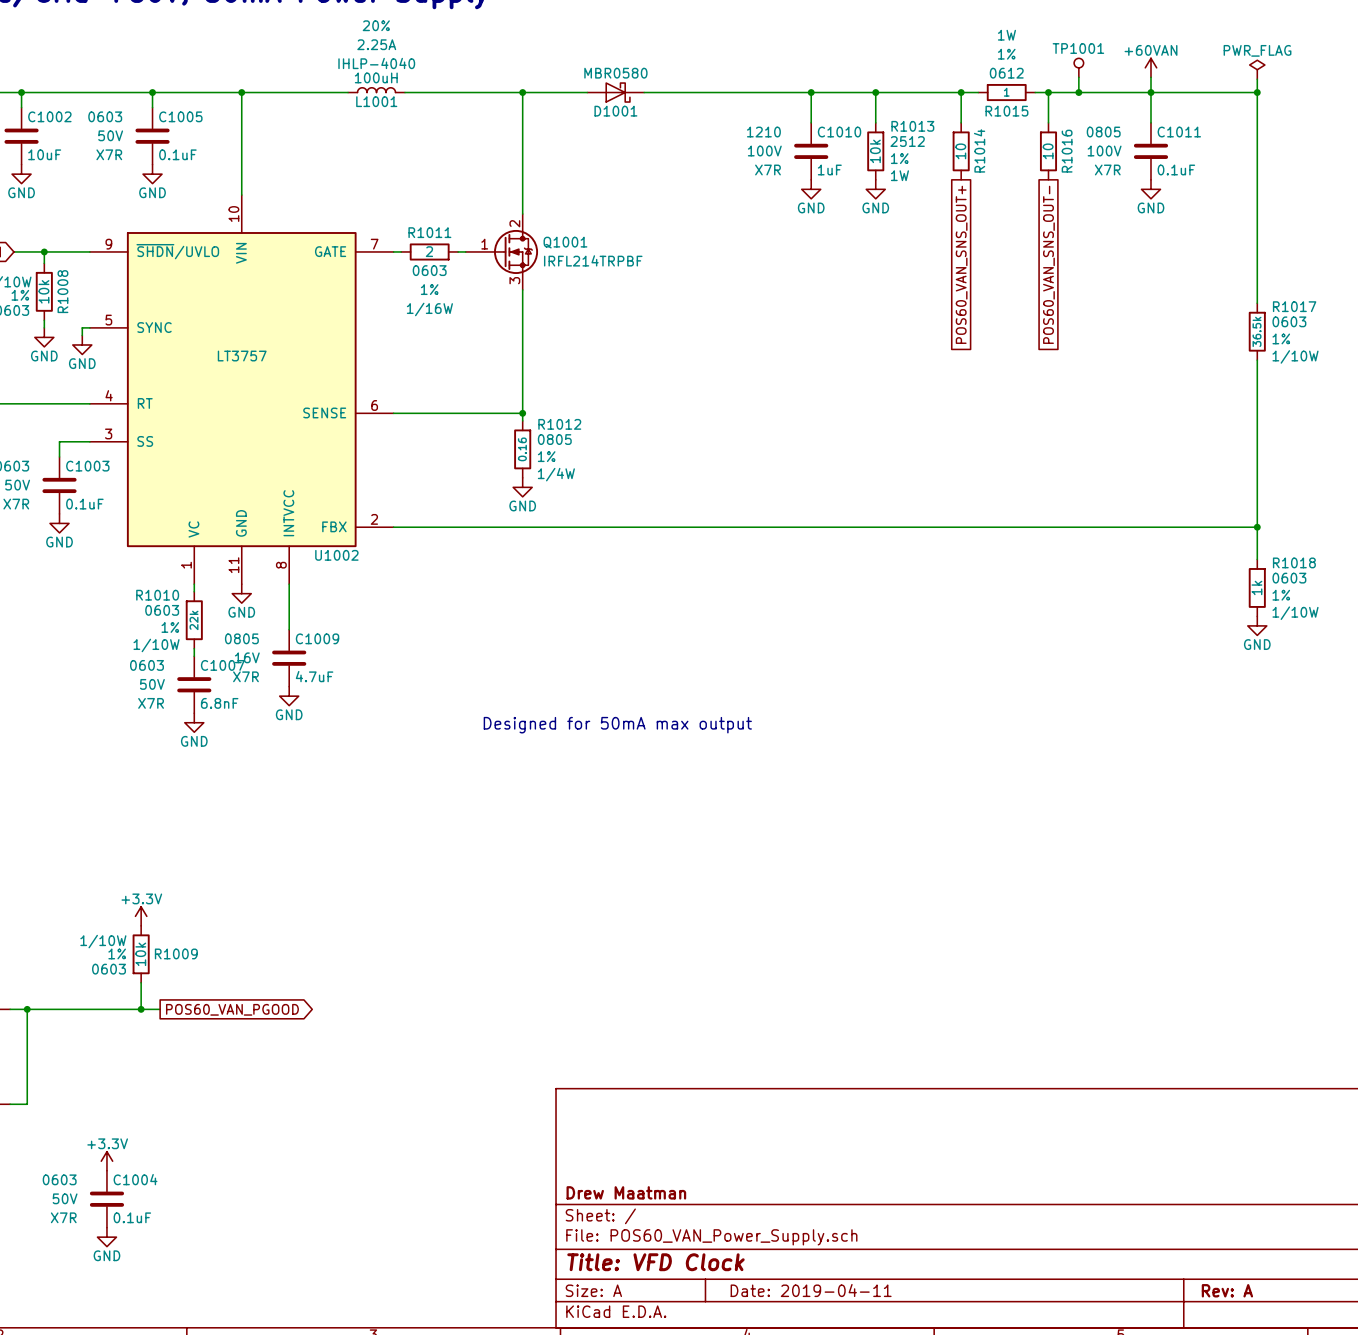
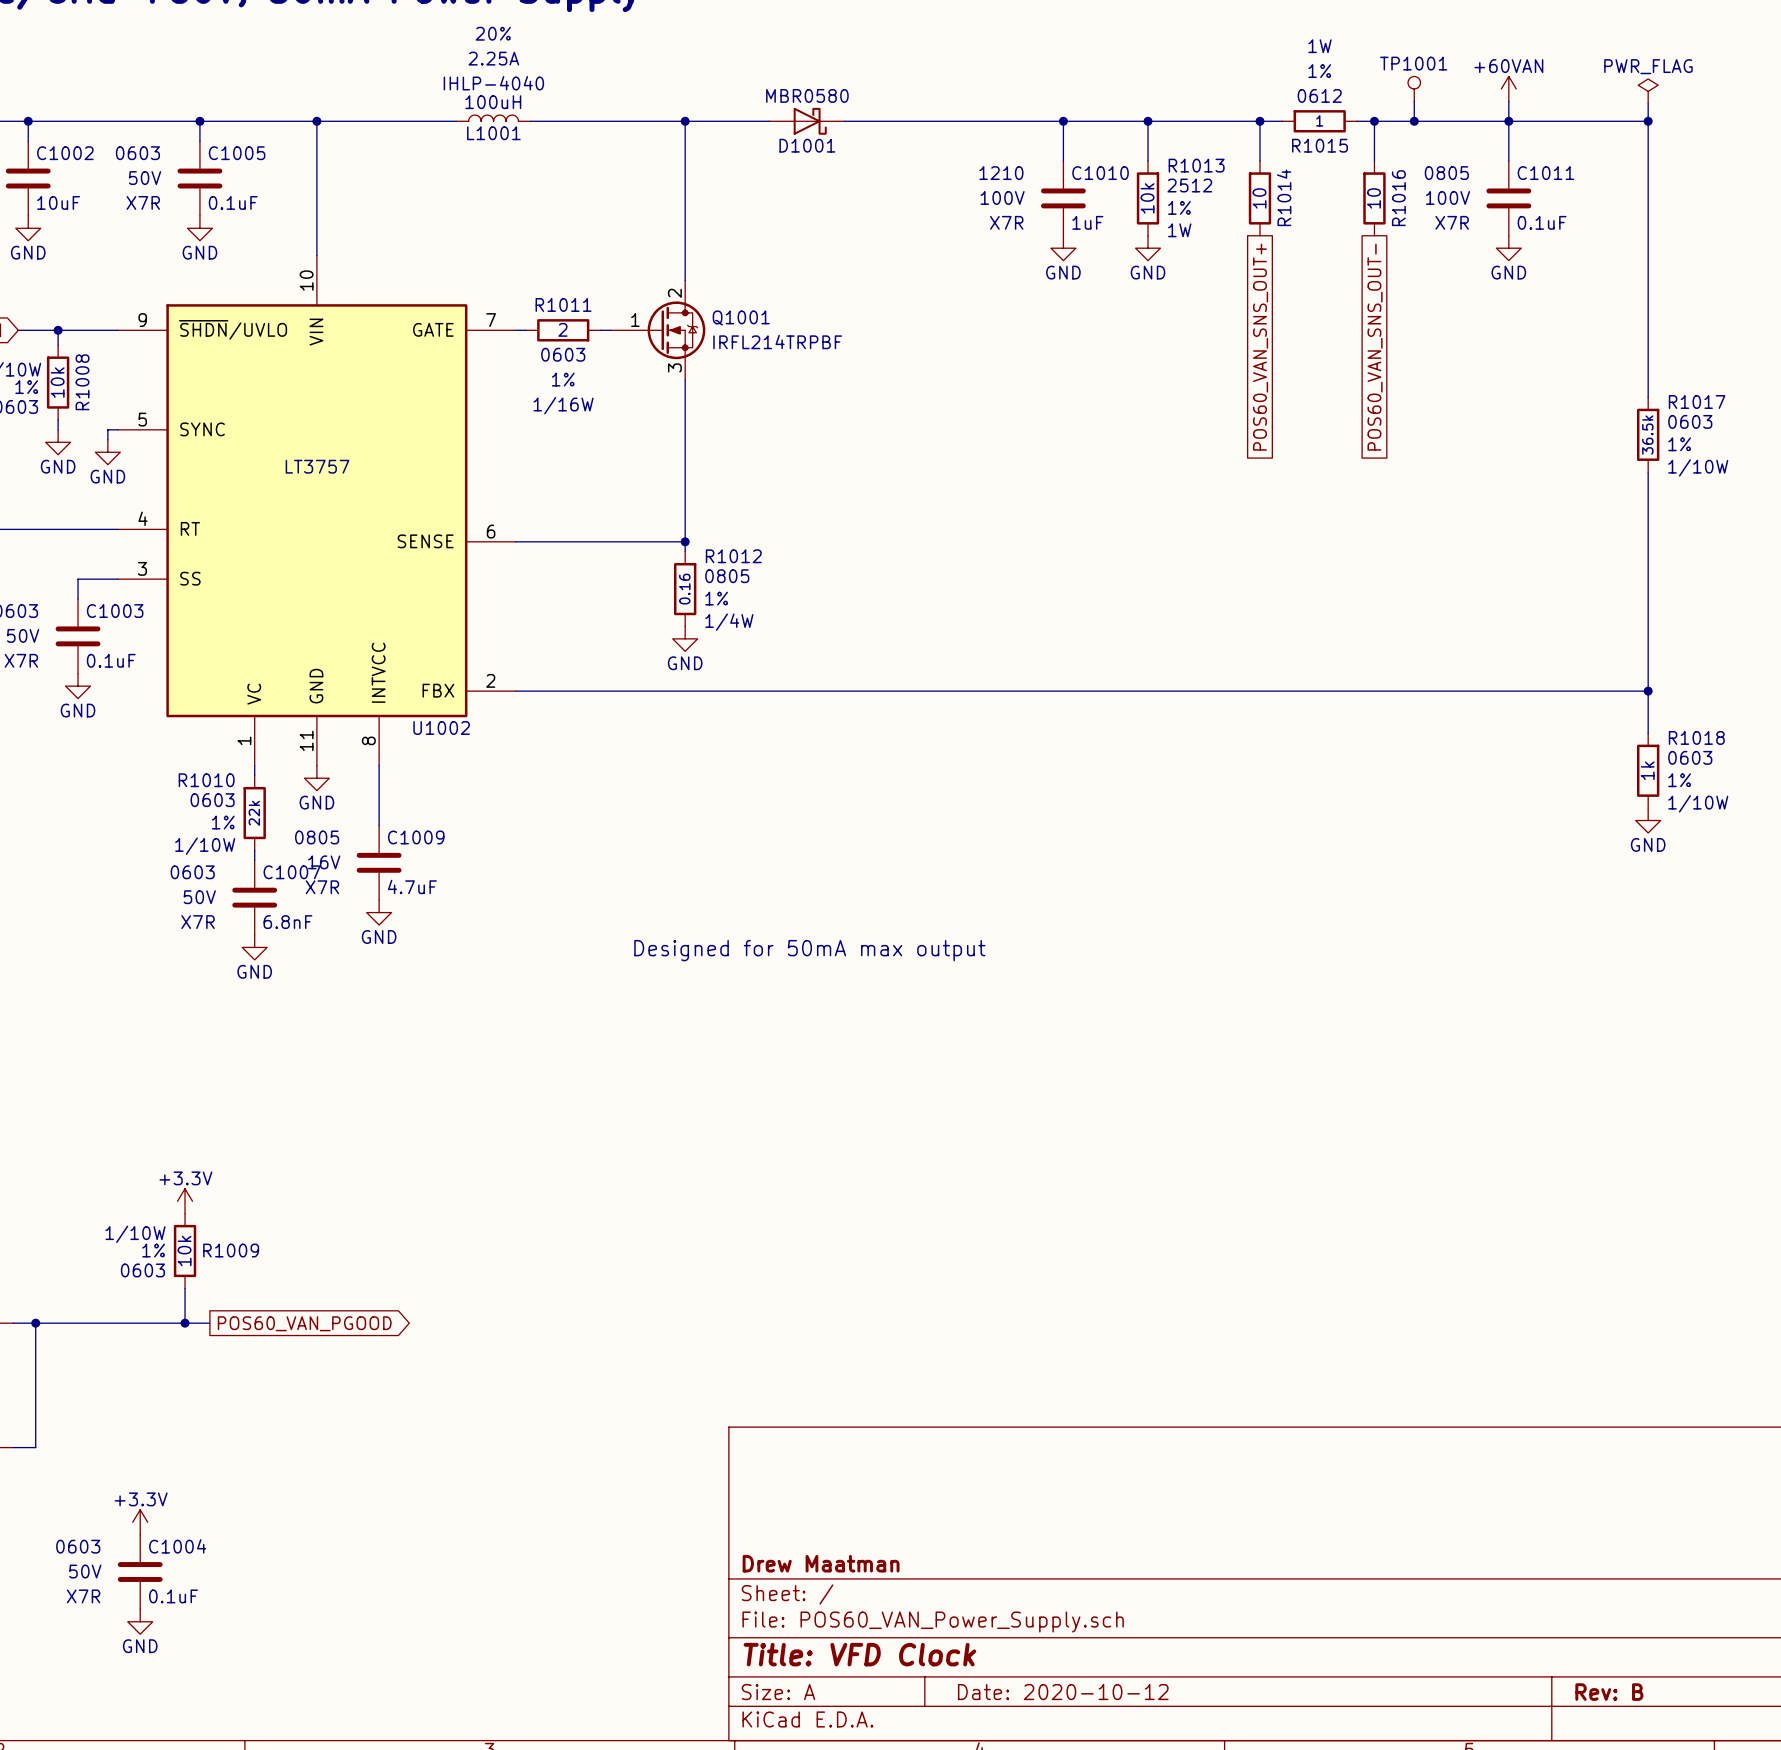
title block: Date: 2019-04-11 (811, 1290) -> Date: 2020-10-12 (1063, 1692)
title block: Rev: A (1227, 1290) -> Rev: B (1609, 1692)

